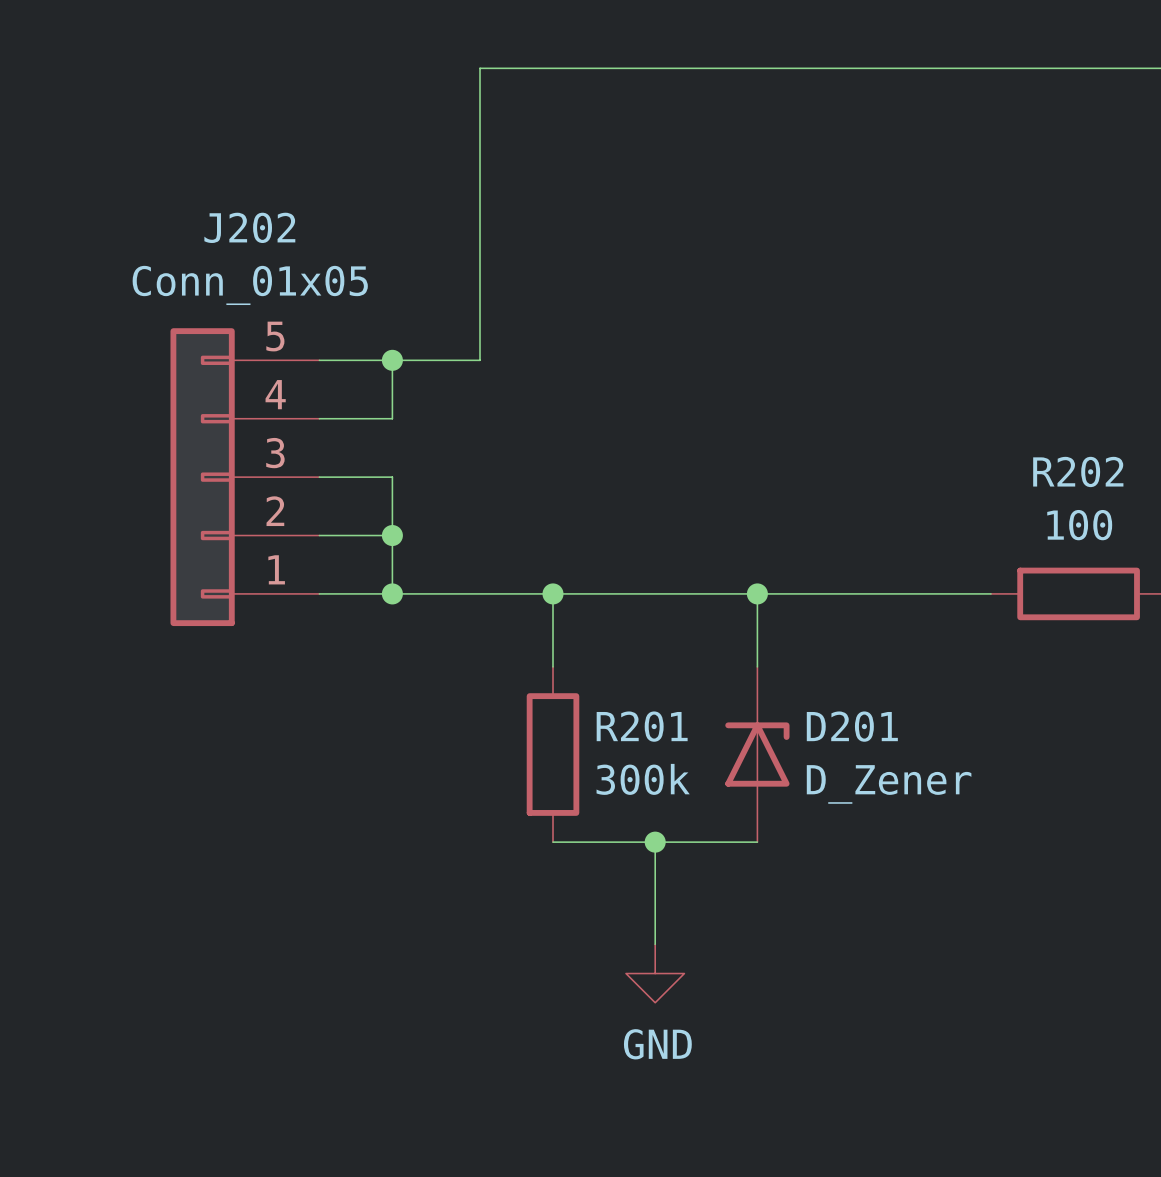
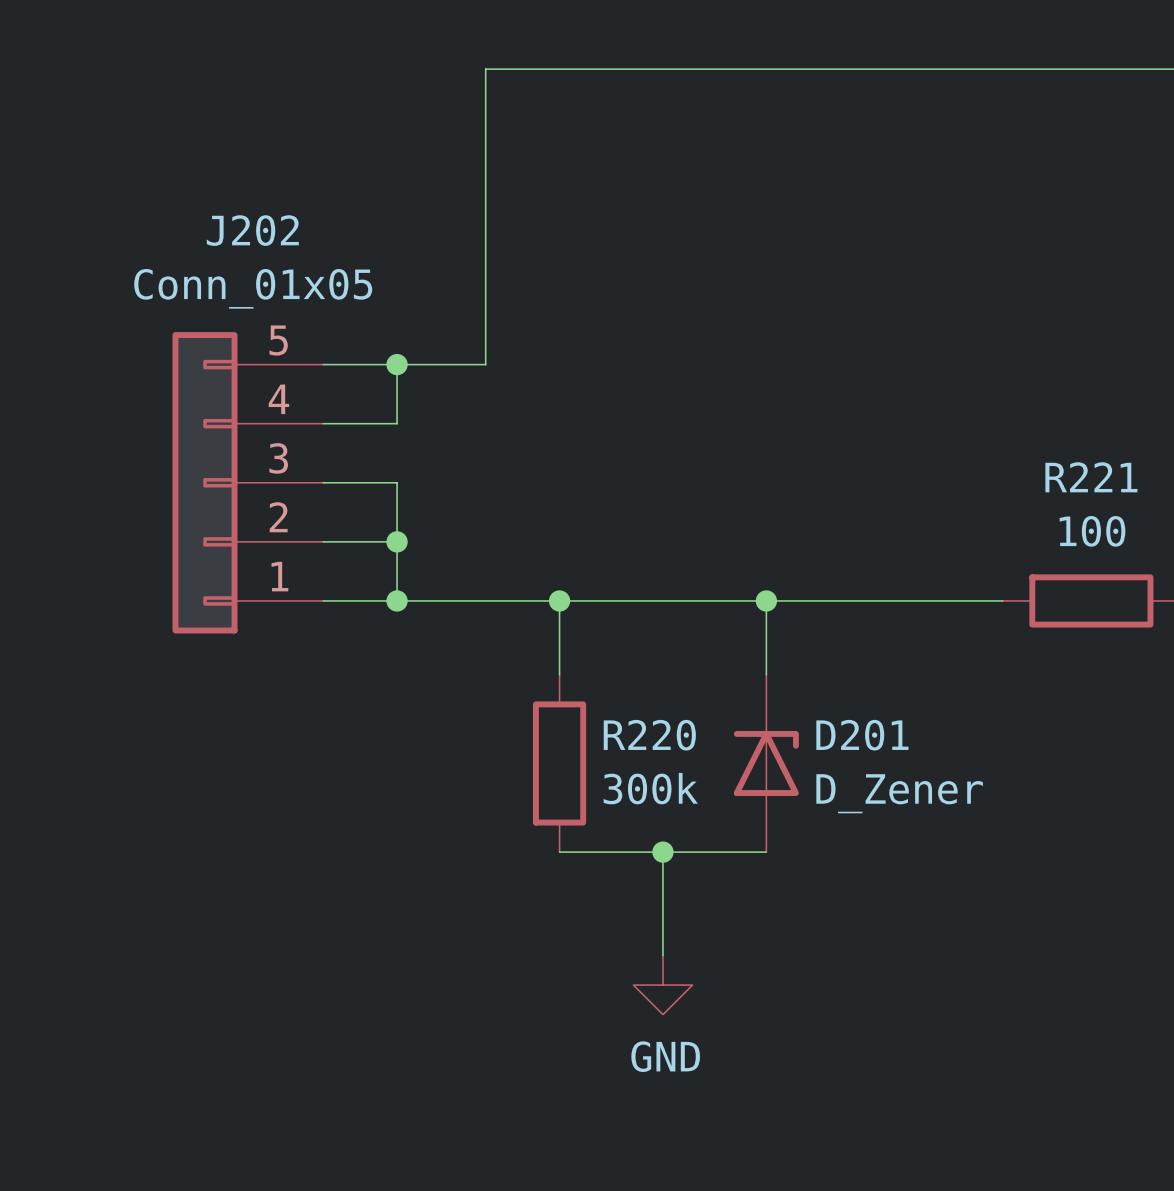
R202 name: R202 (1078, 471) -> R221 (1091, 477)
R201 name: R201 (642, 726) -> R220 (649, 735)

